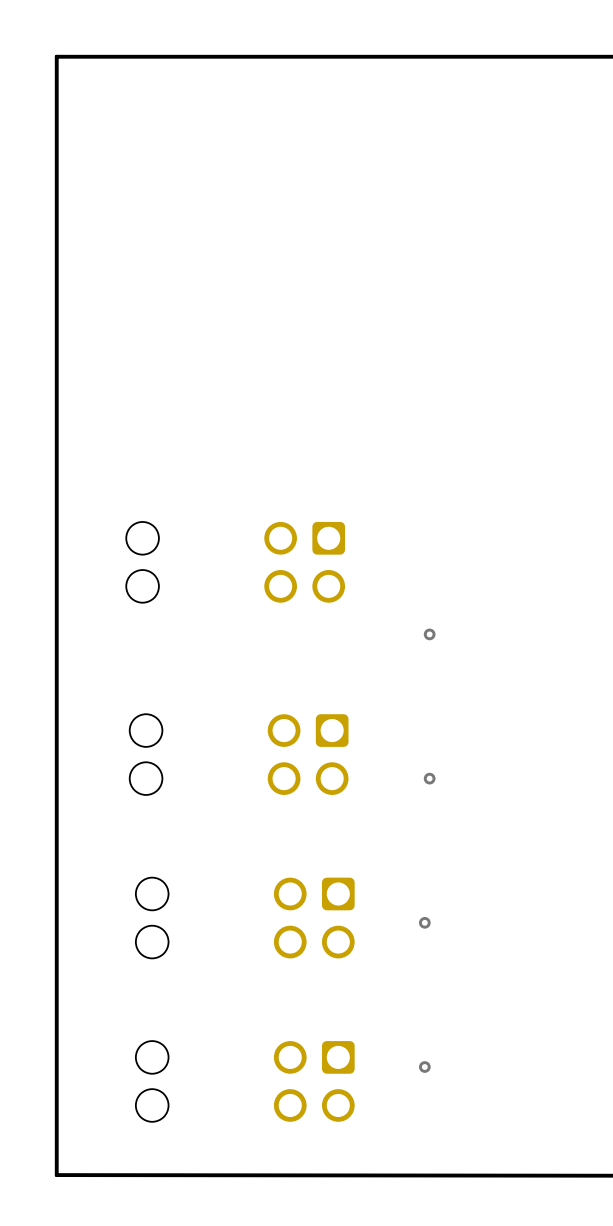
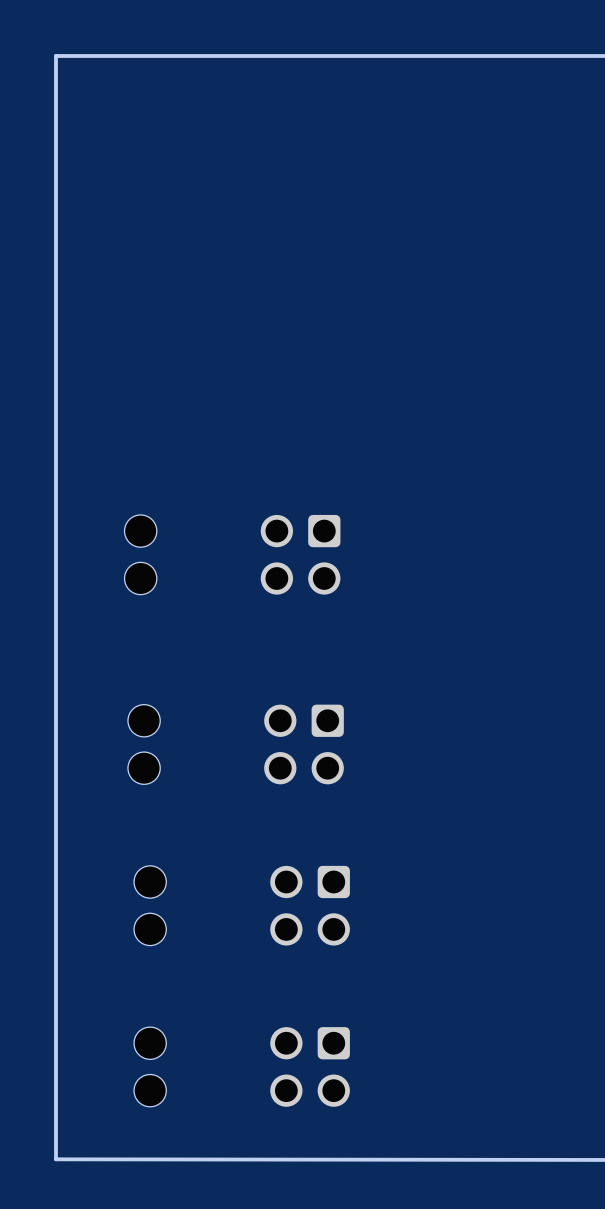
via: (429, 634) -> none
via: (429, 778) -> none
via: (424, 922) -> none
via: (424, 1067) -> none

